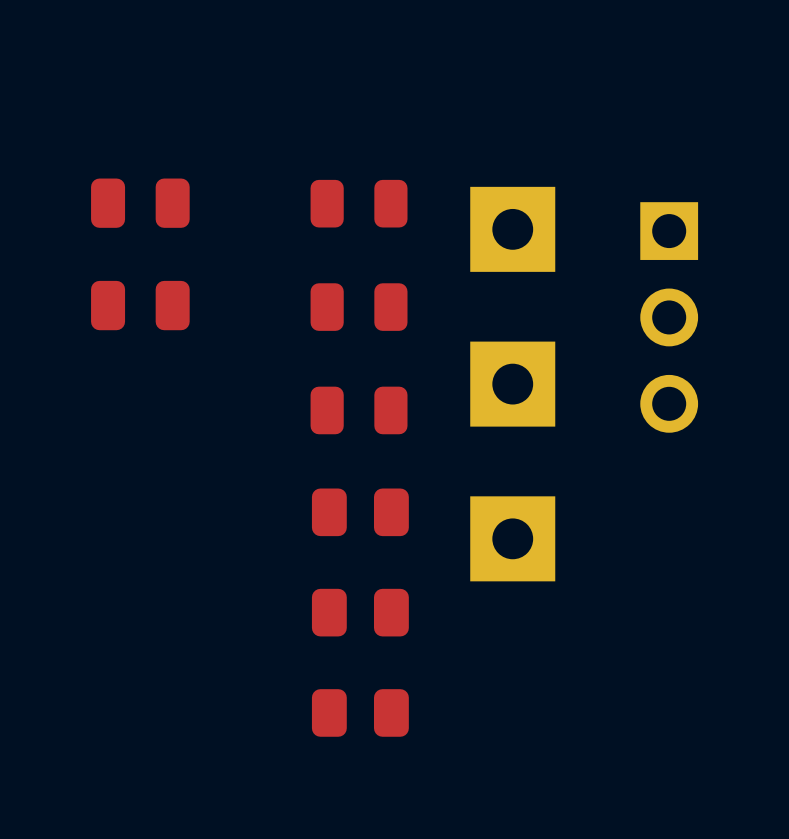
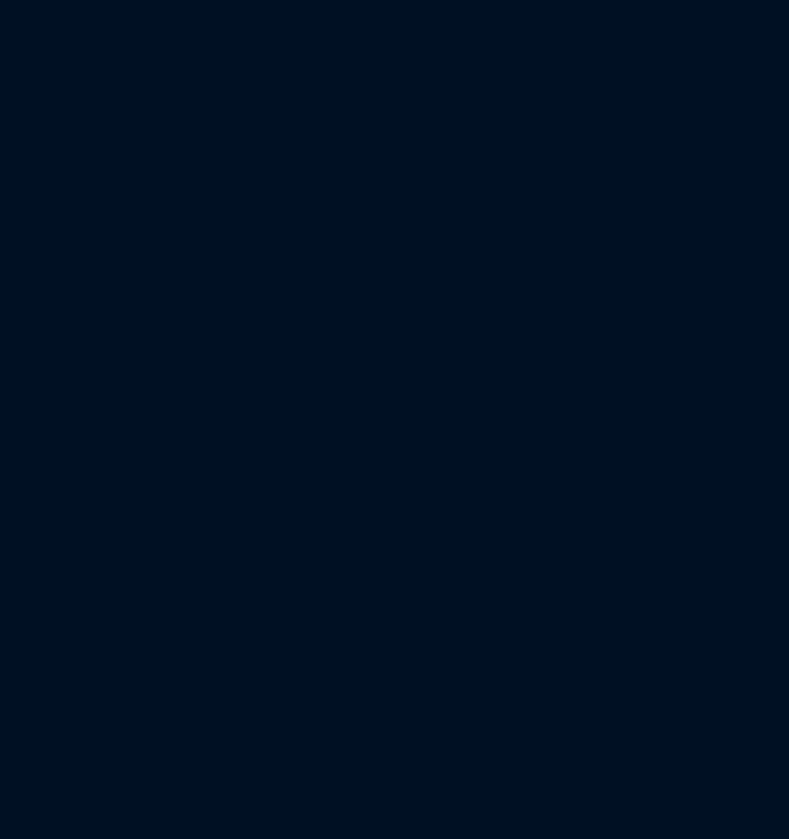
part: (140, 203) -> none
part: (359, 203) -> none
part: (512, 229) -> none
part: (140, 305) -> none
part: (359, 307) -> none
part: (669, 317) -> none
part: (512, 384) -> none
part: (359, 410) -> none
part: (360, 512) -> none
part: (512, 538) -> none
part: (360, 612) -> none
part: (360, 712) -> none

